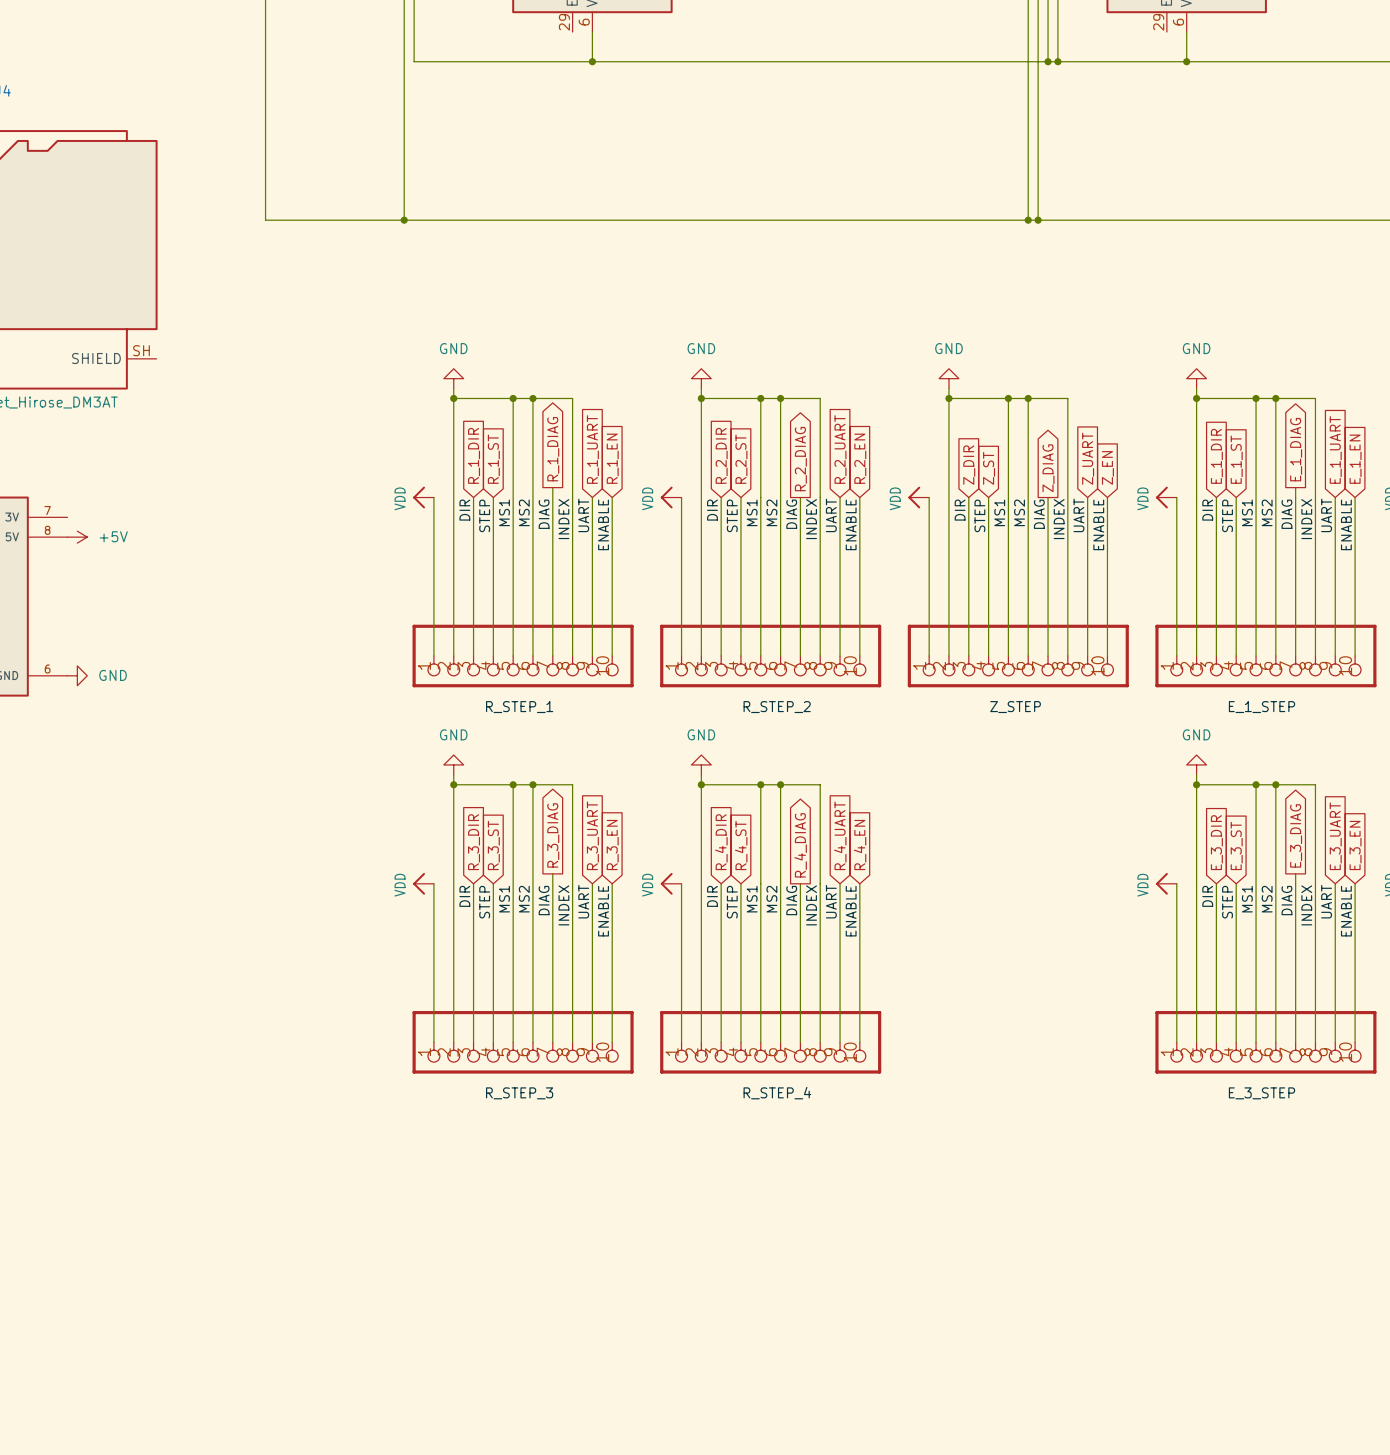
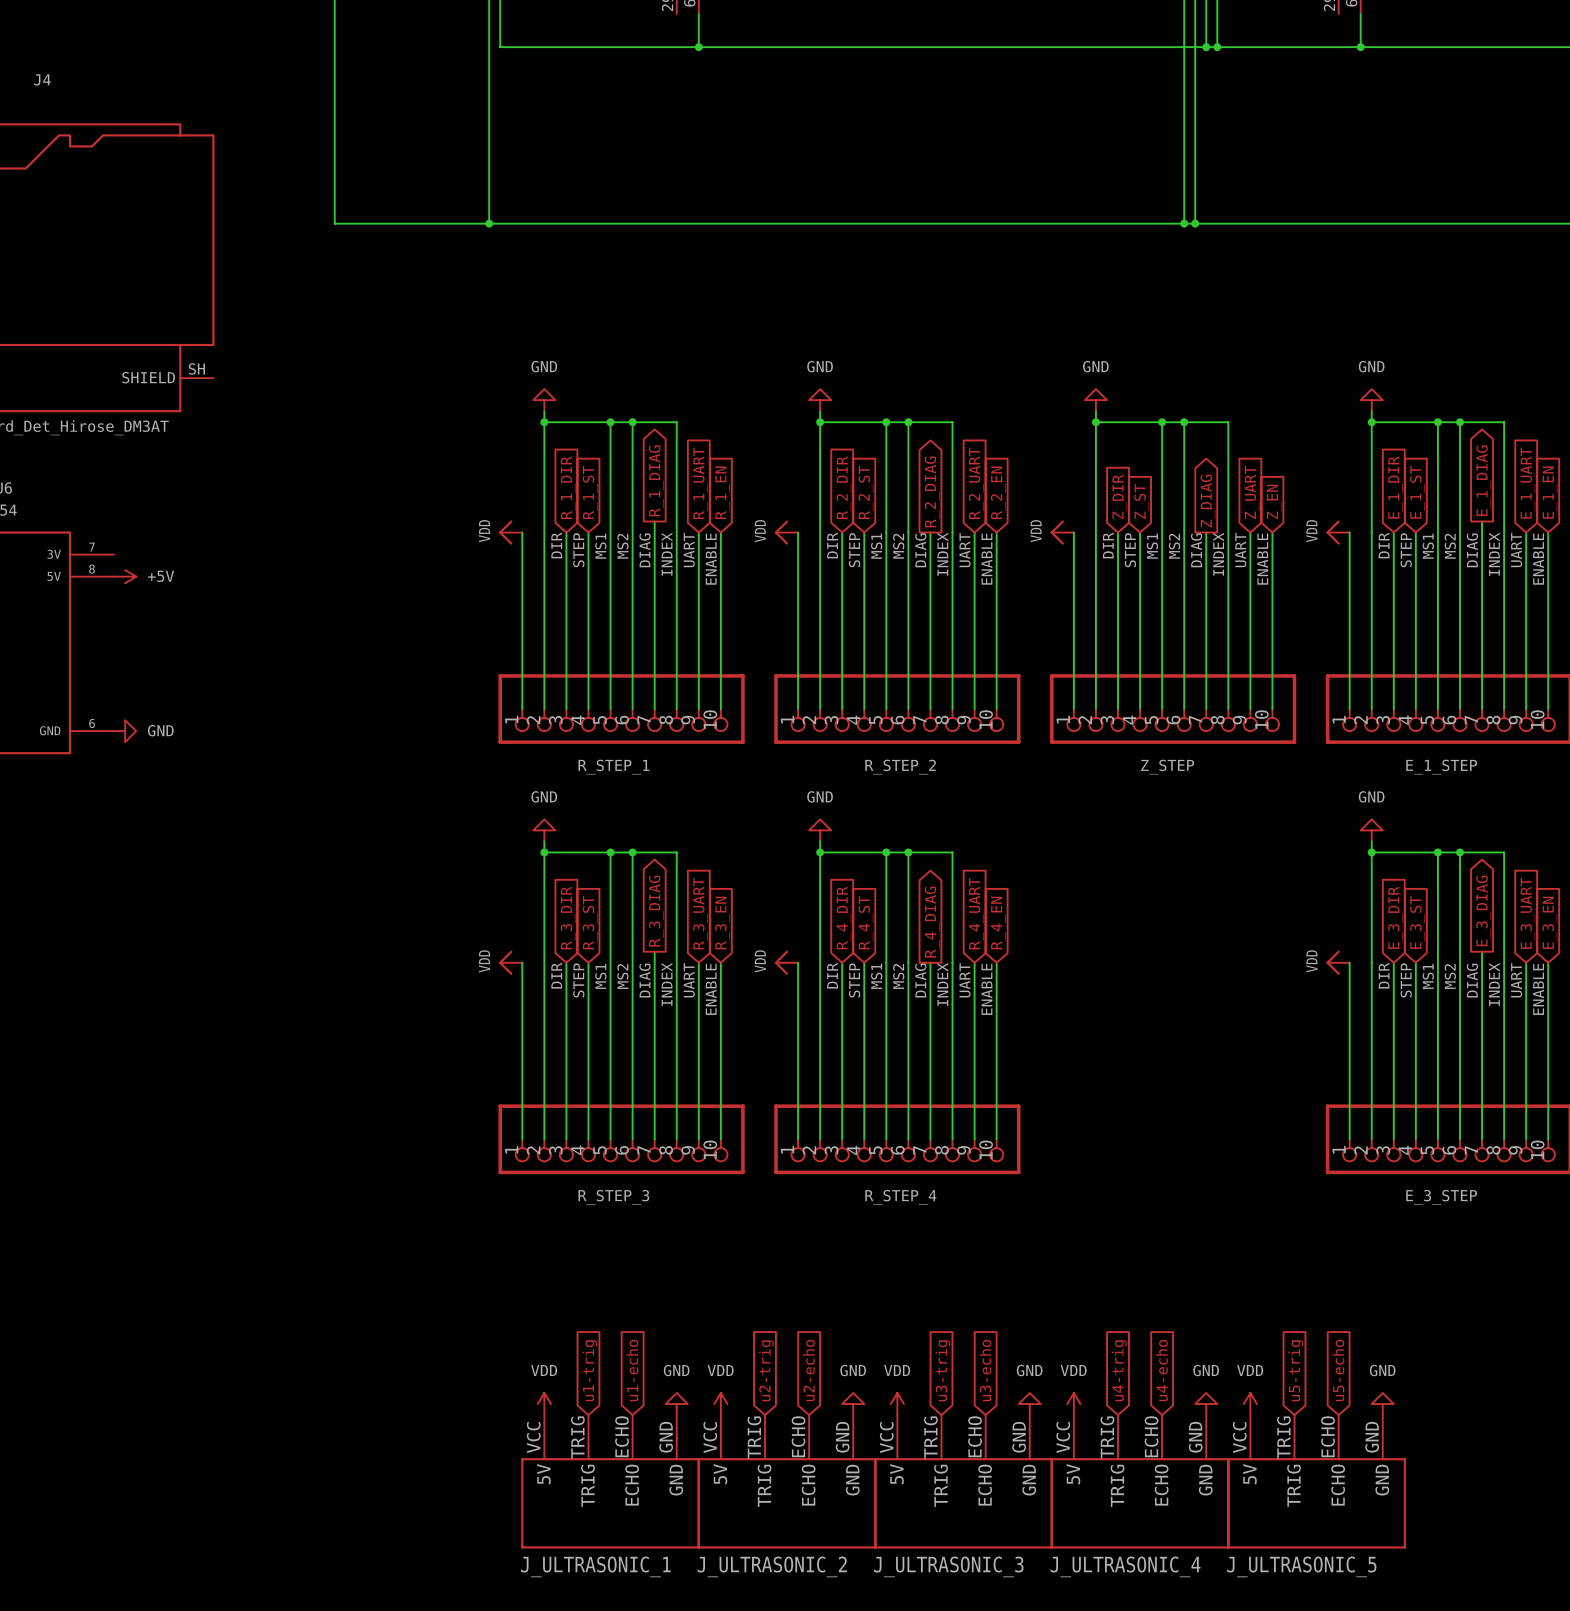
global label: none -> u1-echo (632, 1370)
global label: none -> u2-echo (808, 1370)
global label: none -> u3-echo (985, 1370)
global label: none -> u4-echo (1162, 1370)
global label: none -> u5-echo (1338, 1370)
global label: none -> u1-trig (589, 1370)
global label: none -> u2-trig (766, 1370)
global label: none -> u3-trig (942, 1370)
global label: none -> u4-trig (1119, 1370)
global label: none -> u5-trig (1295, 1370)
power symbol: none -> VDD (544, 1404)
power symbol: none -> GND (676, 1404)
power symbol: none -> VDD (720, 1404)
power symbol: none -> GND (853, 1404)
power symbol: none -> VDD (897, 1404)
power symbol: none -> GND (1029, 1404)
power symbol: none -> VDD (1073, 1404)
power symbol: none -> GND (1206, 1404)
power symbol: none -> VDD (1250, 1404)
power symbol: none -> GND (1382, 1404)
J_ULTRASONIC_1: none -> (610, 1481)
J_ULTRASONIC_2: none -> (787, 1481)
J_ULTRASONIC_3: none -> (963, 1481)
J_ULTRASONIC_4: none -> (1140, 1481)
J_ULTRASONIC_5: none -> (1316, 1481)

